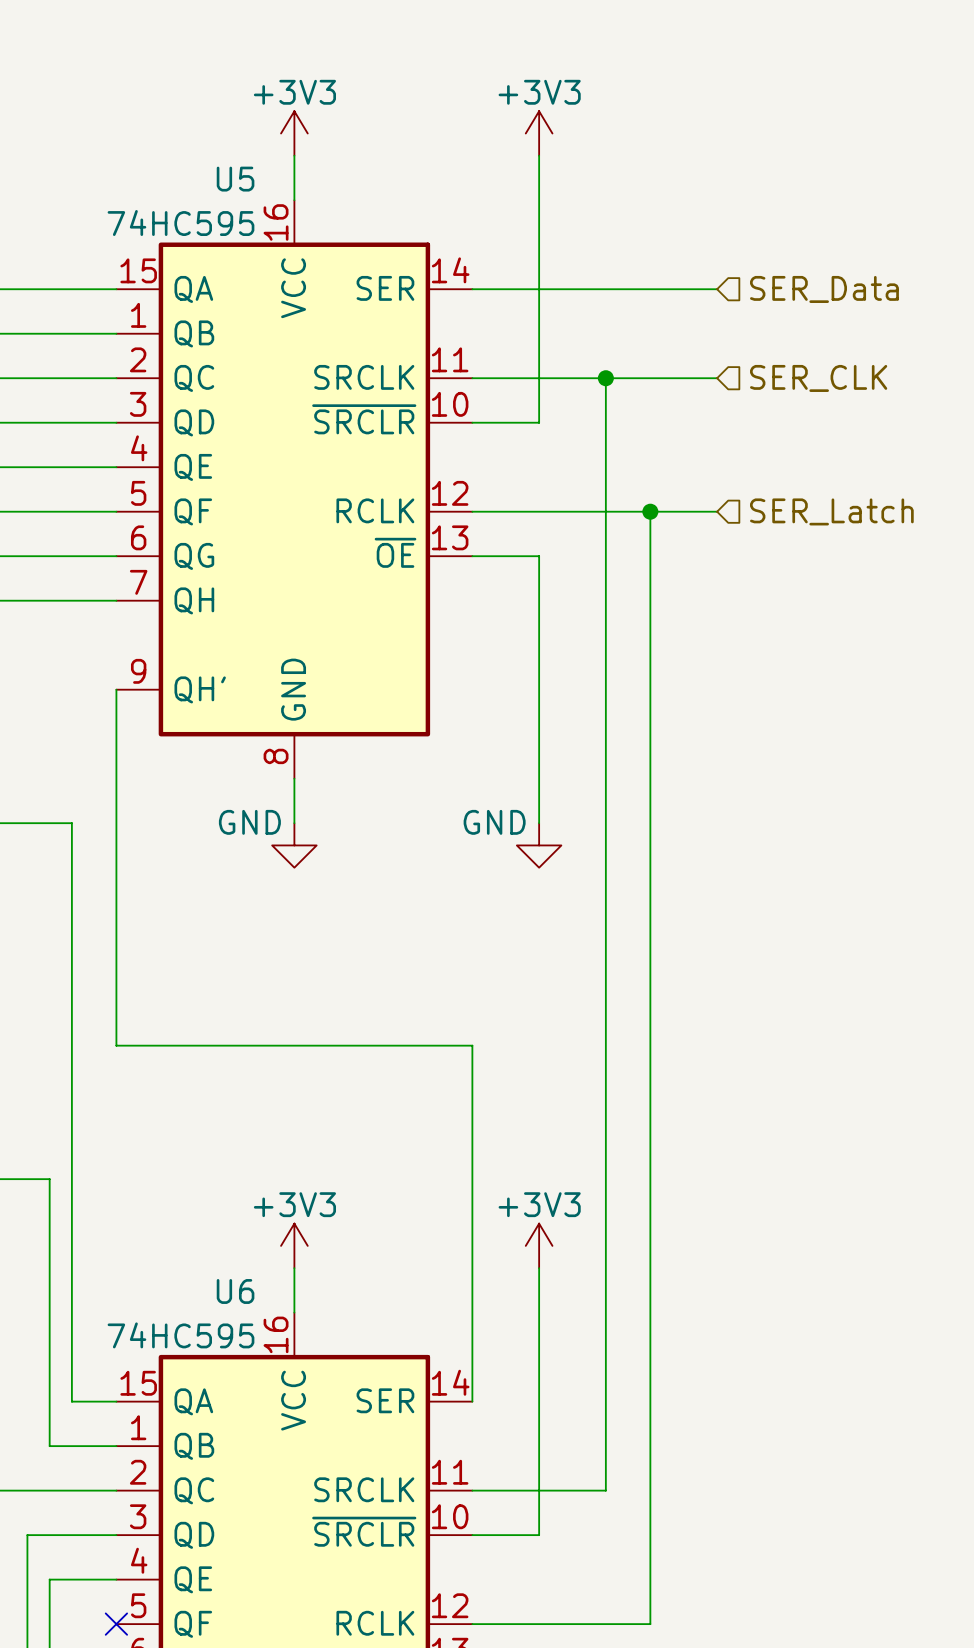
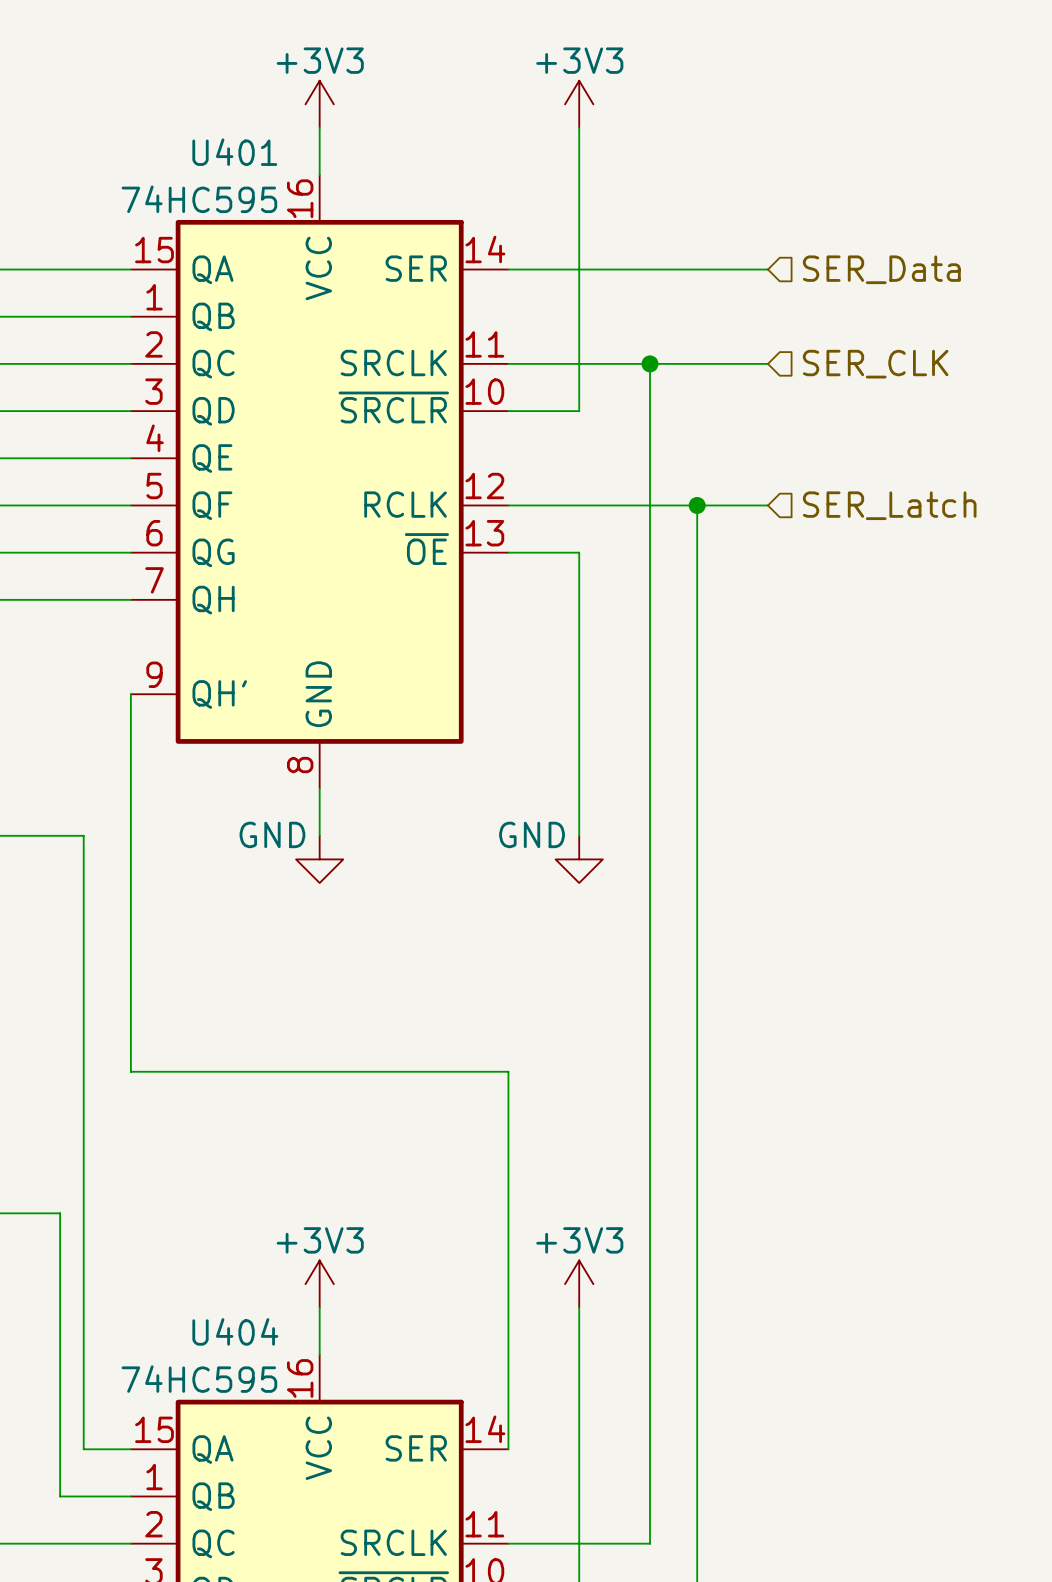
U5 name: U5 (235, 179) -> U401 (234, 152)
U6 name: U6 (235, 1291) -> U404 (235, 1331)

